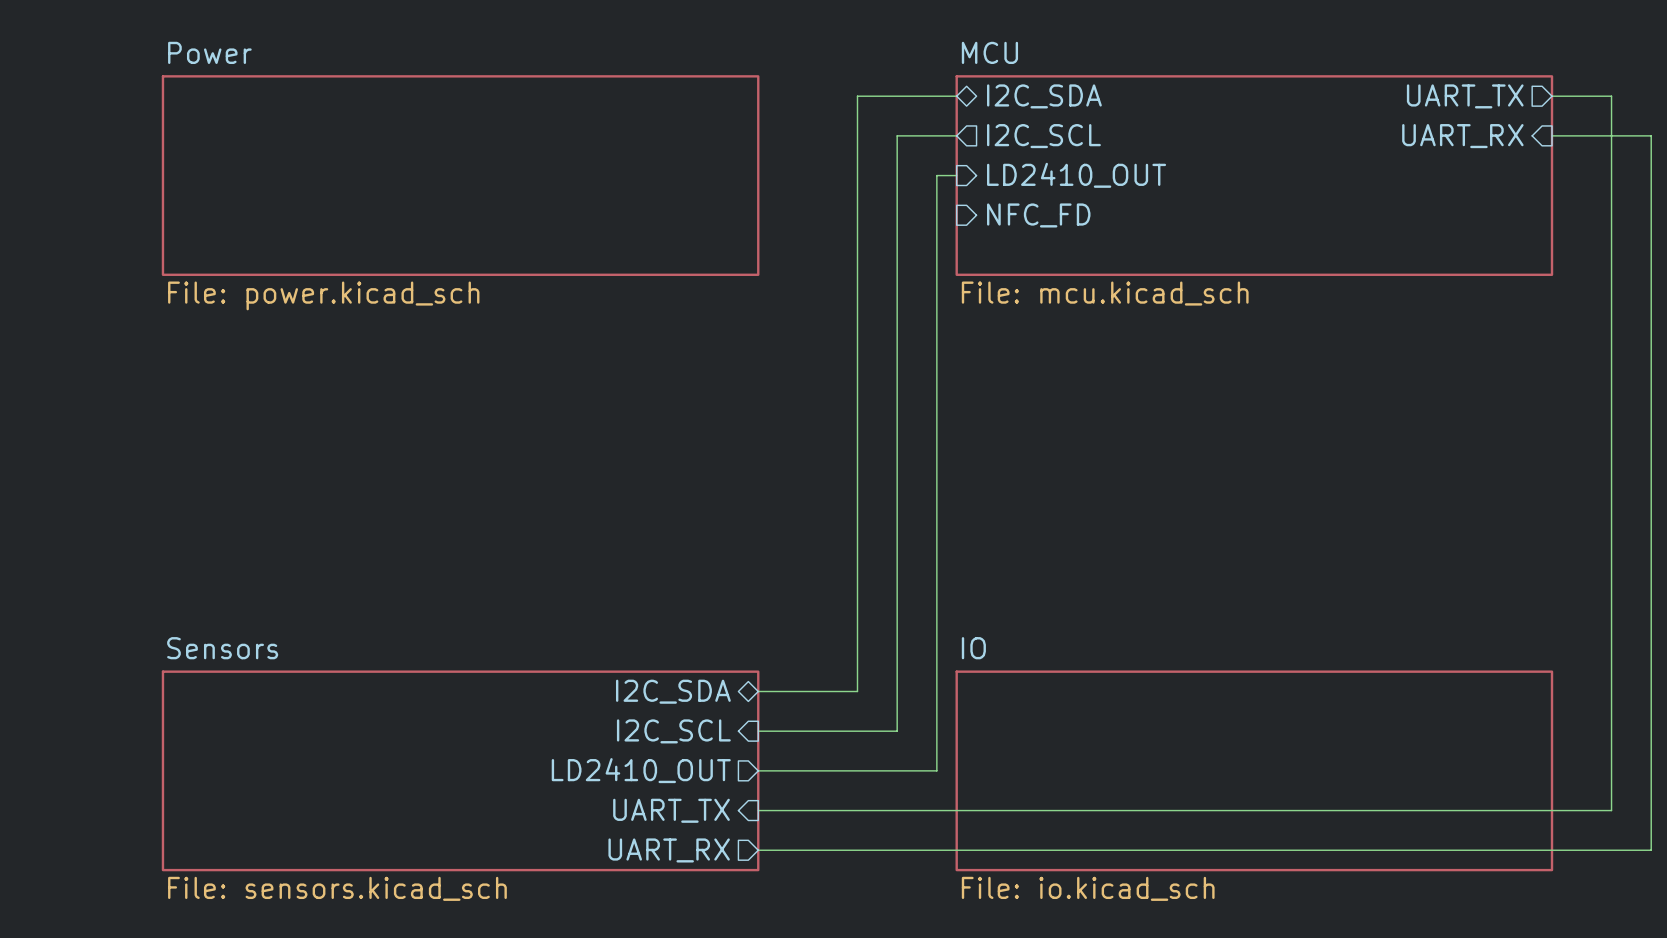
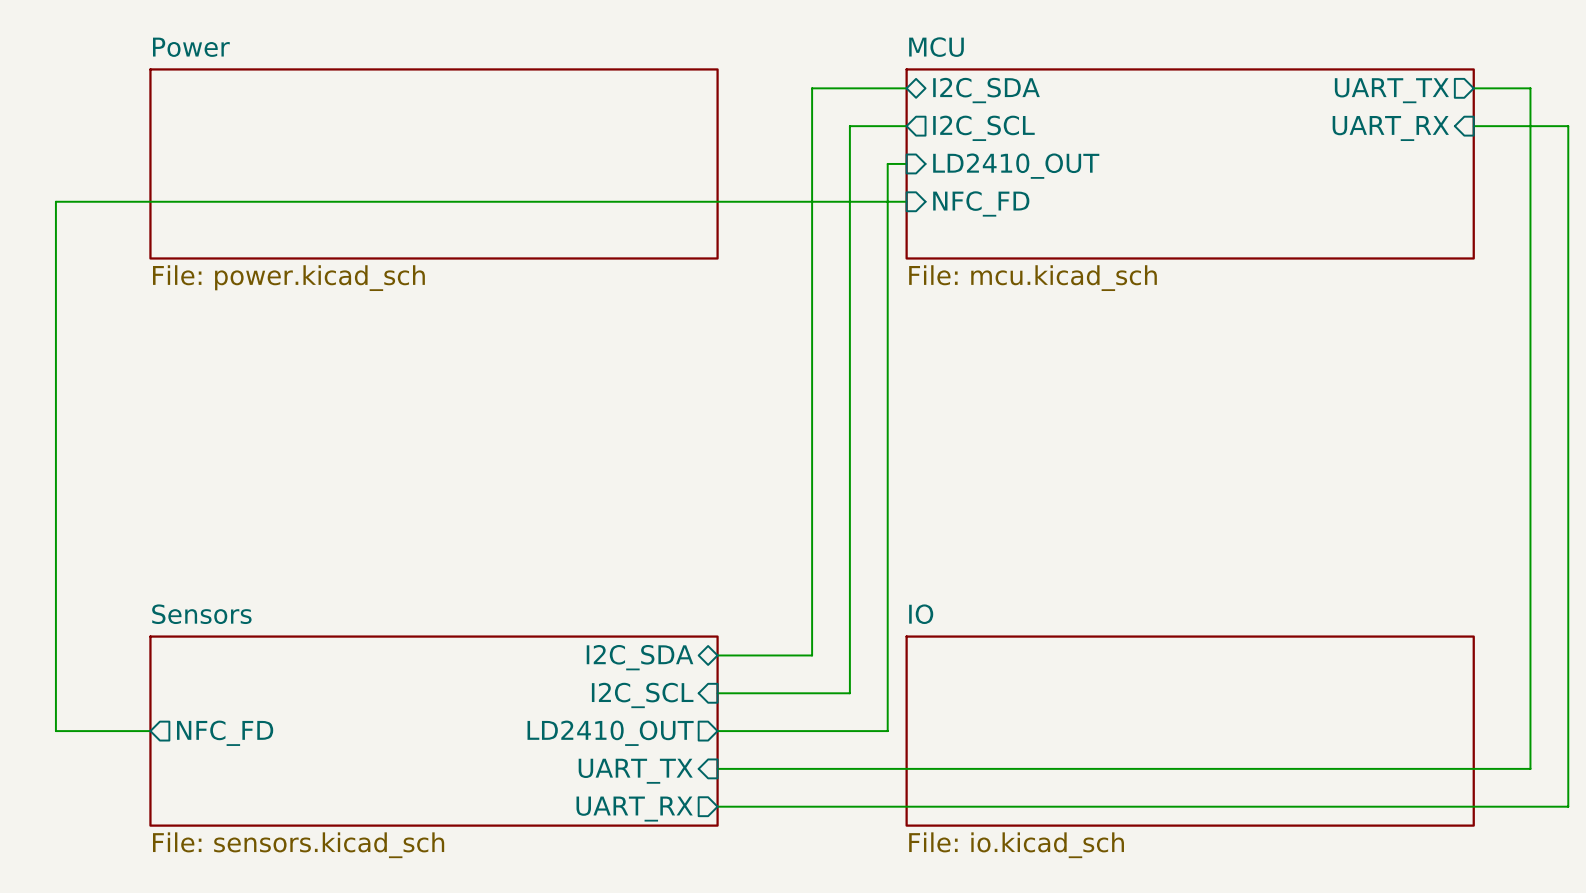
wire: none -> (906, 201) (55, 201) (55, 731) (150, 731)
sheet pin: none -> NFC_FD (225, 733)

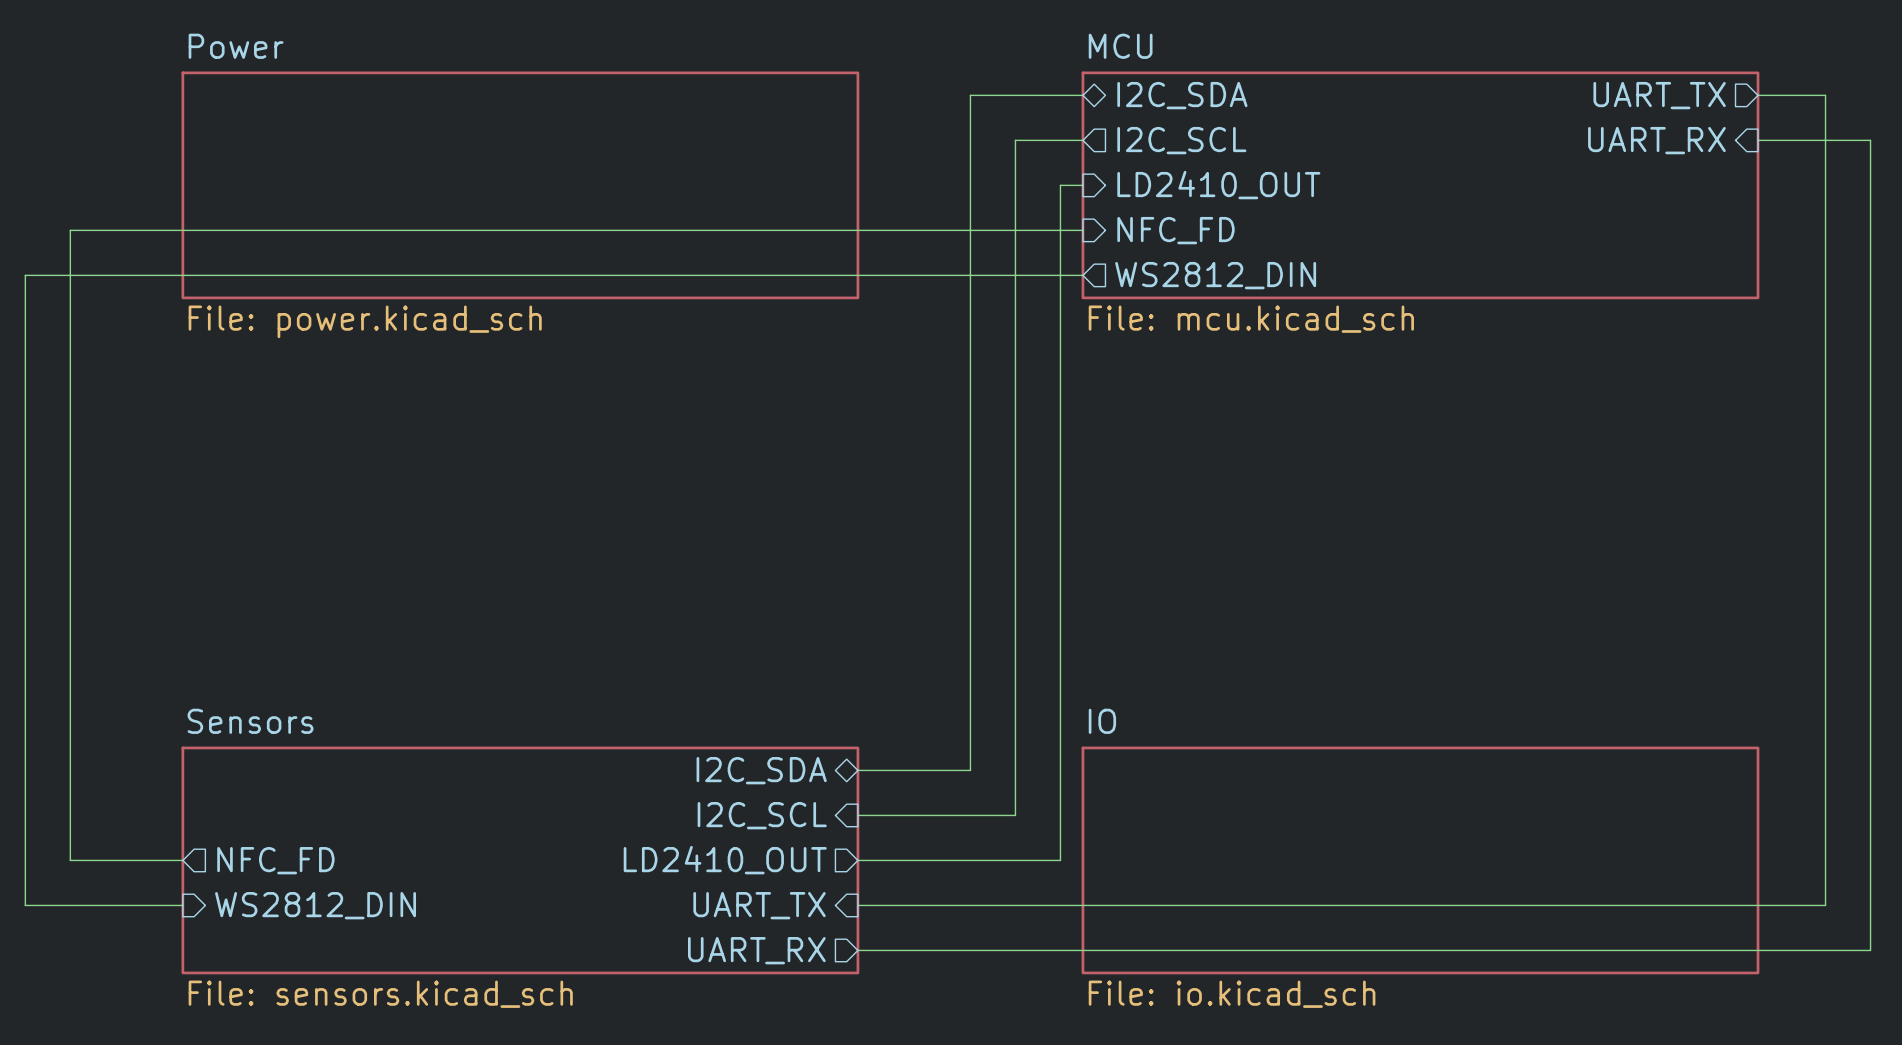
wire: none -> (1082, 275) (25, 275) (25, 905) (182, 905)
sheet pin: none -> WS2812_DIN (1215, 275)
sheet pin: none -> WS2812_DIN (315, 905)

